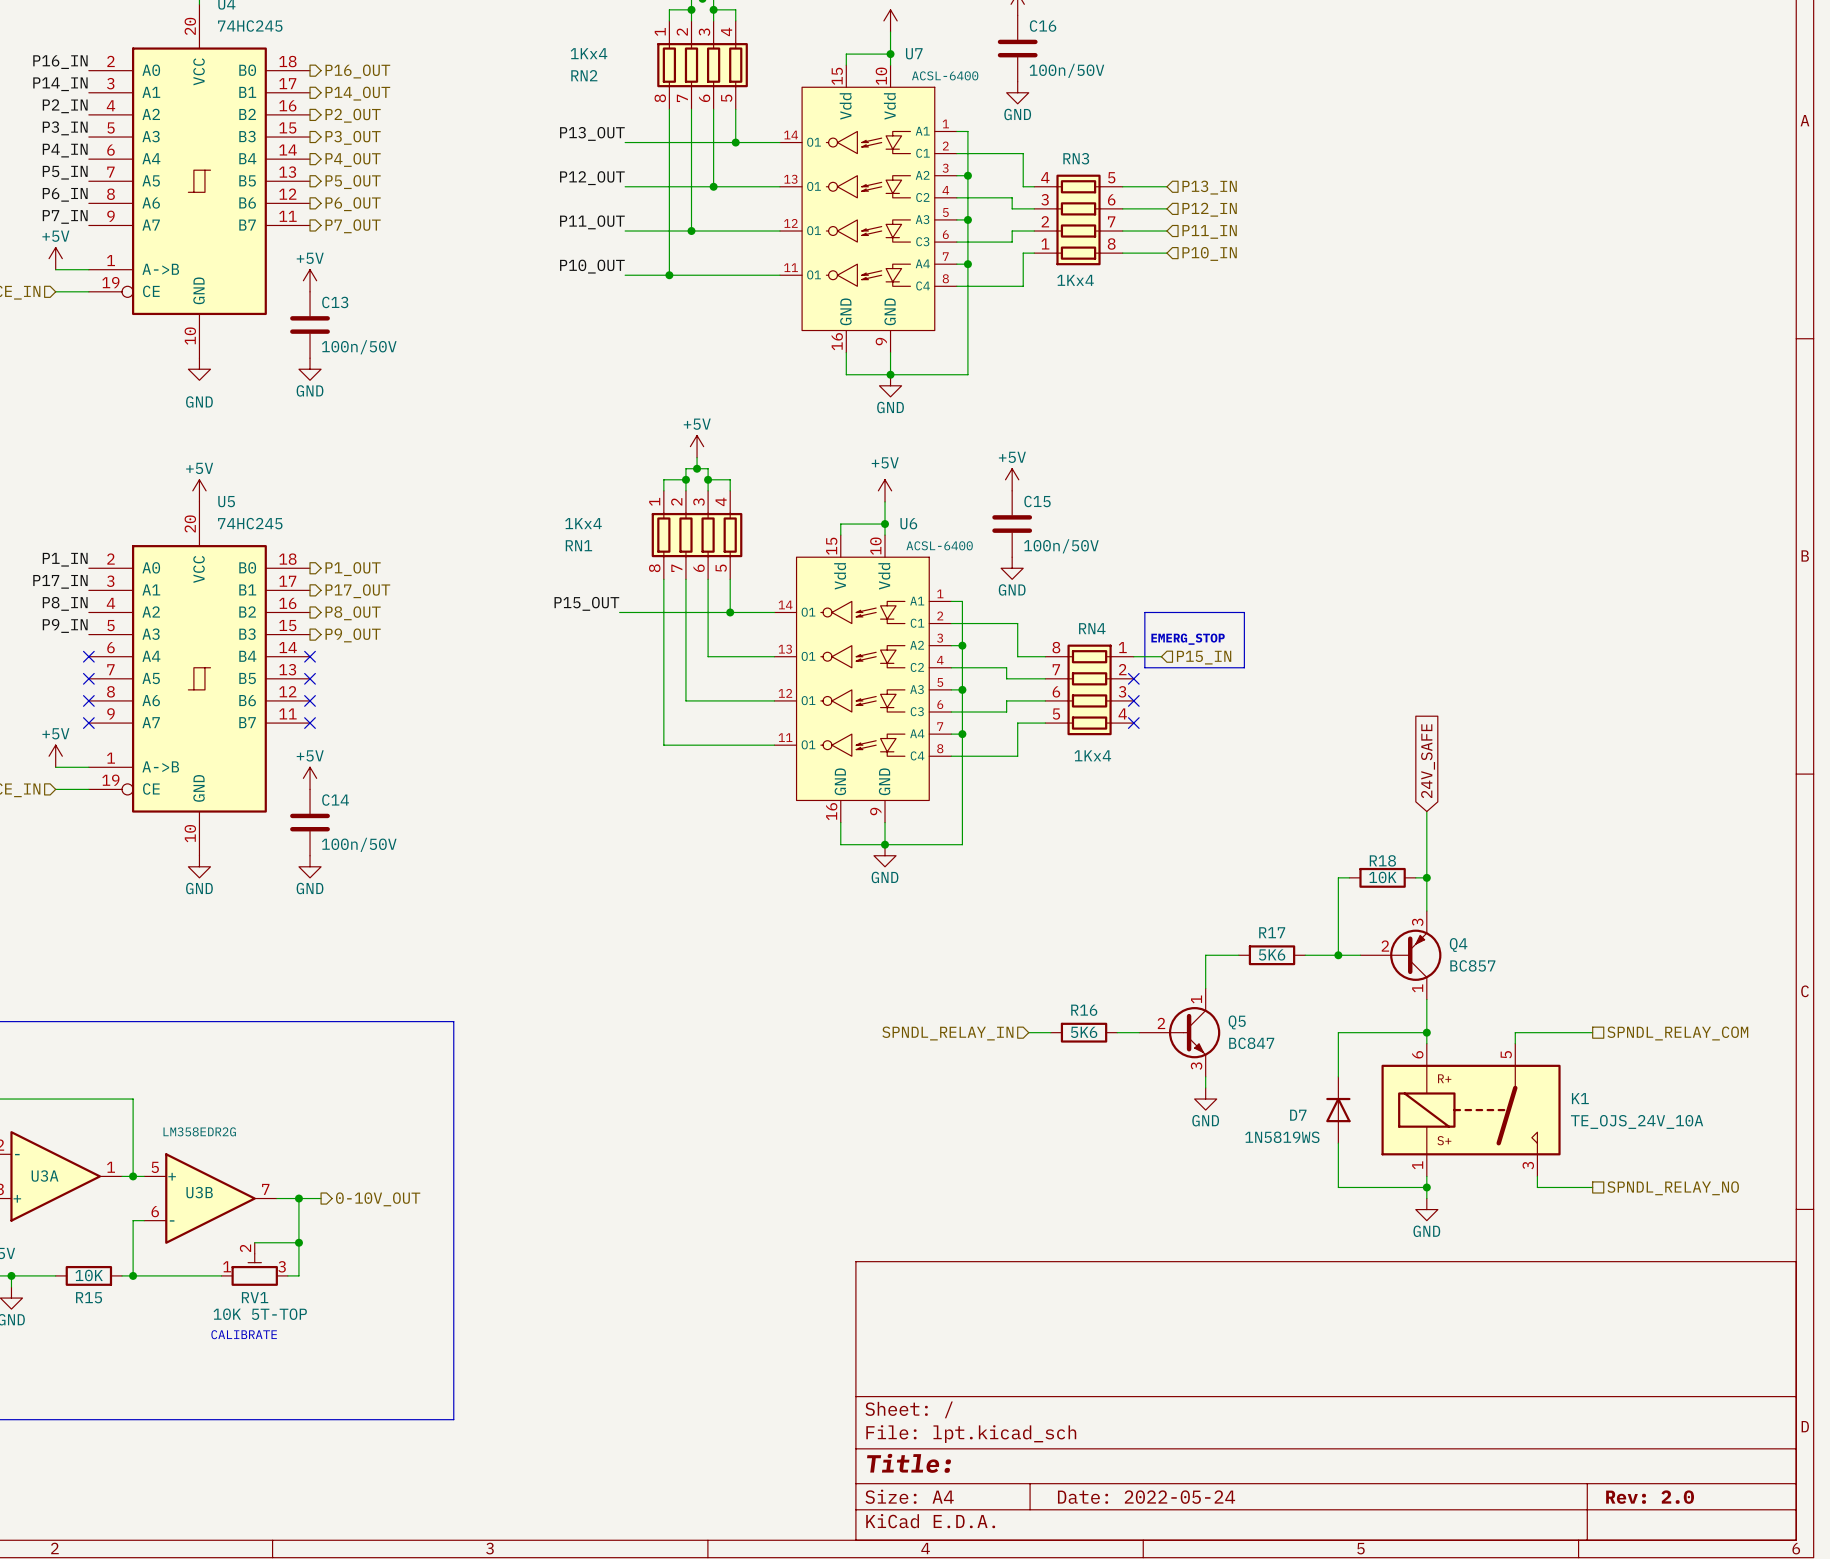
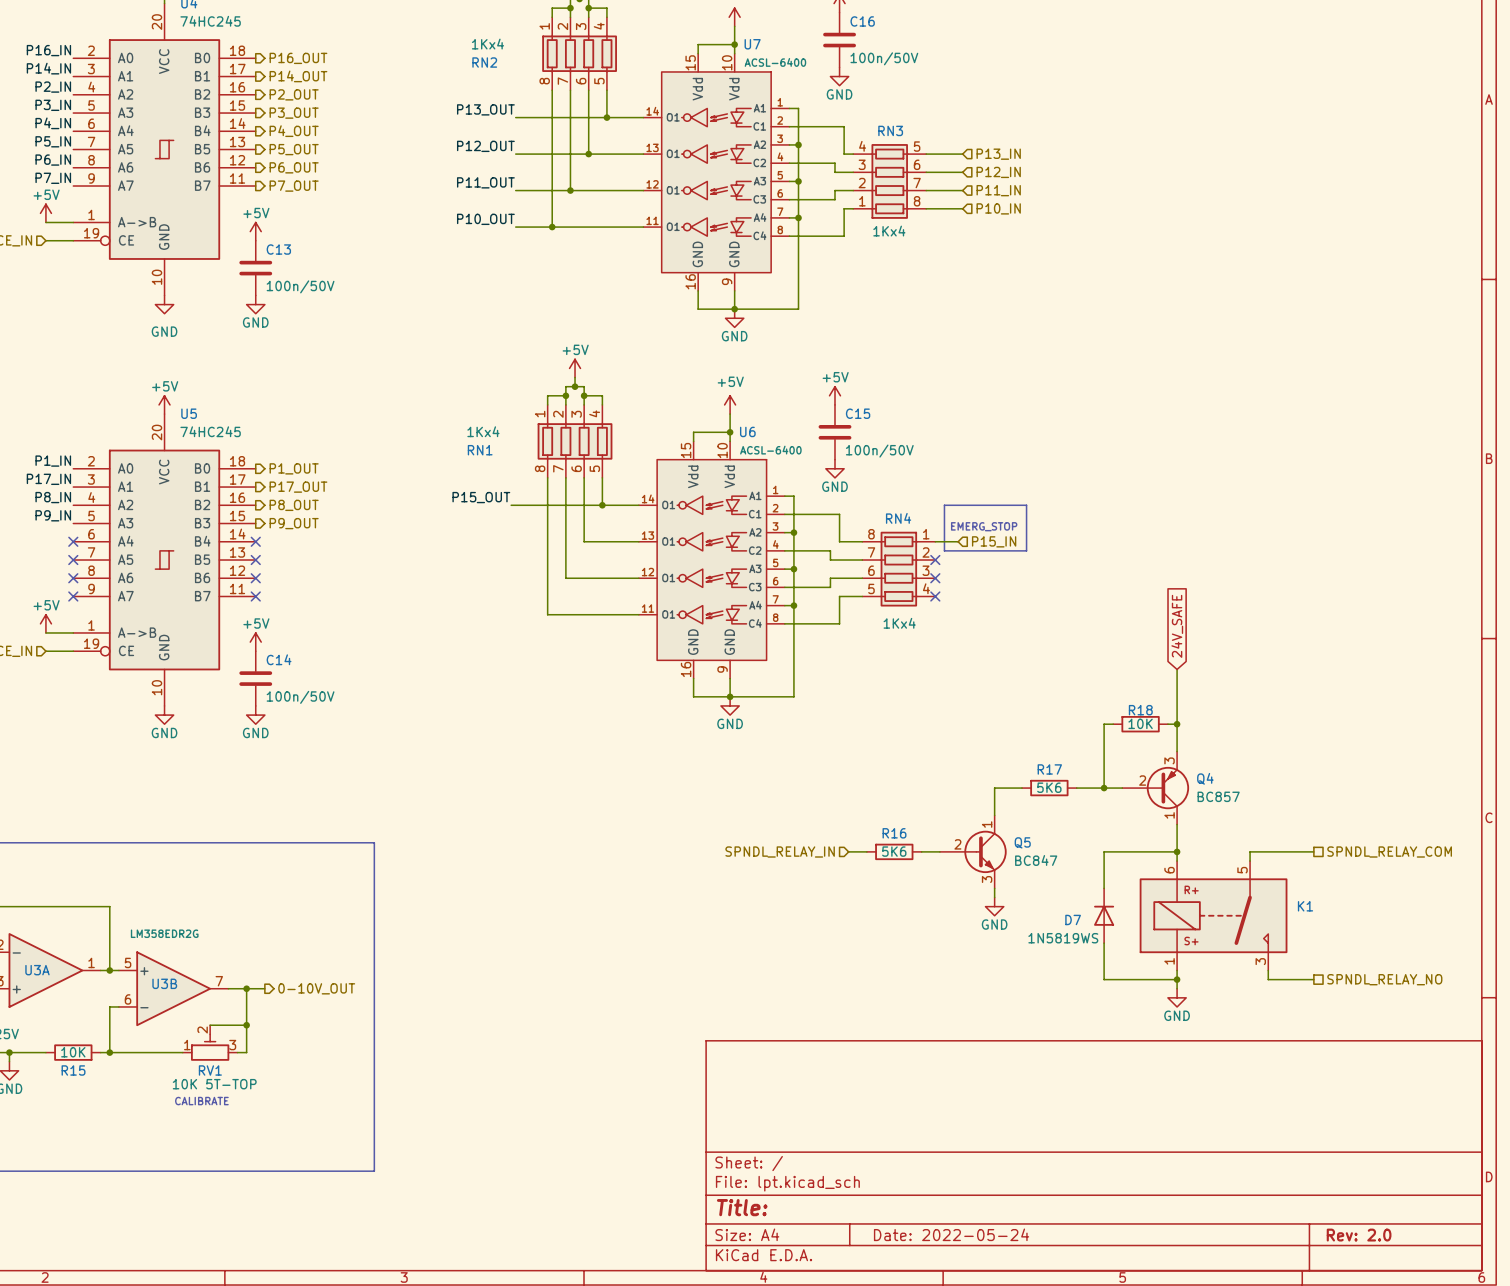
K1 value: TE_OJS_24V_10A (1637, 1121) -> none

